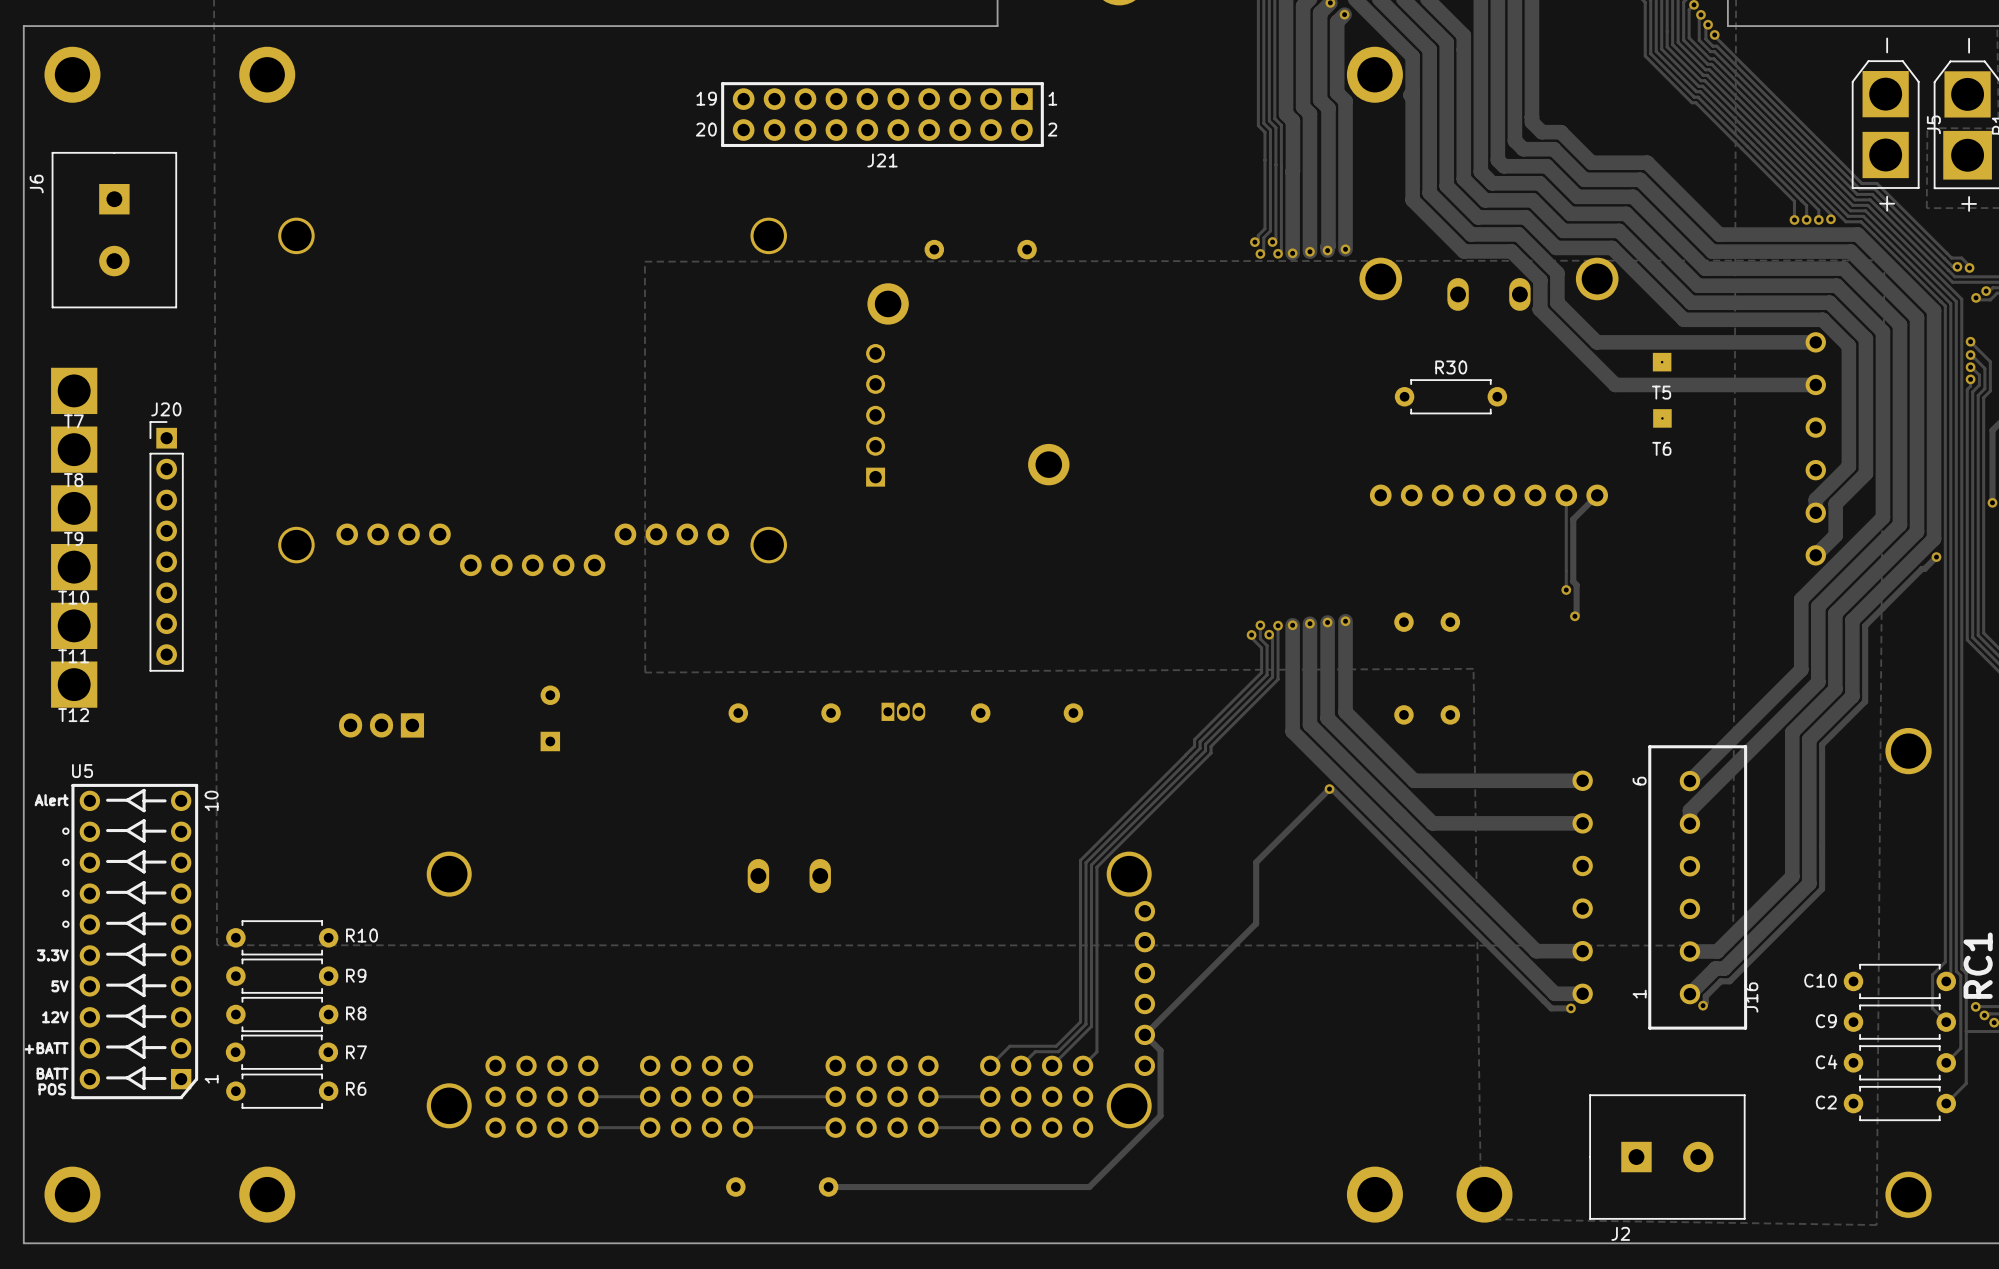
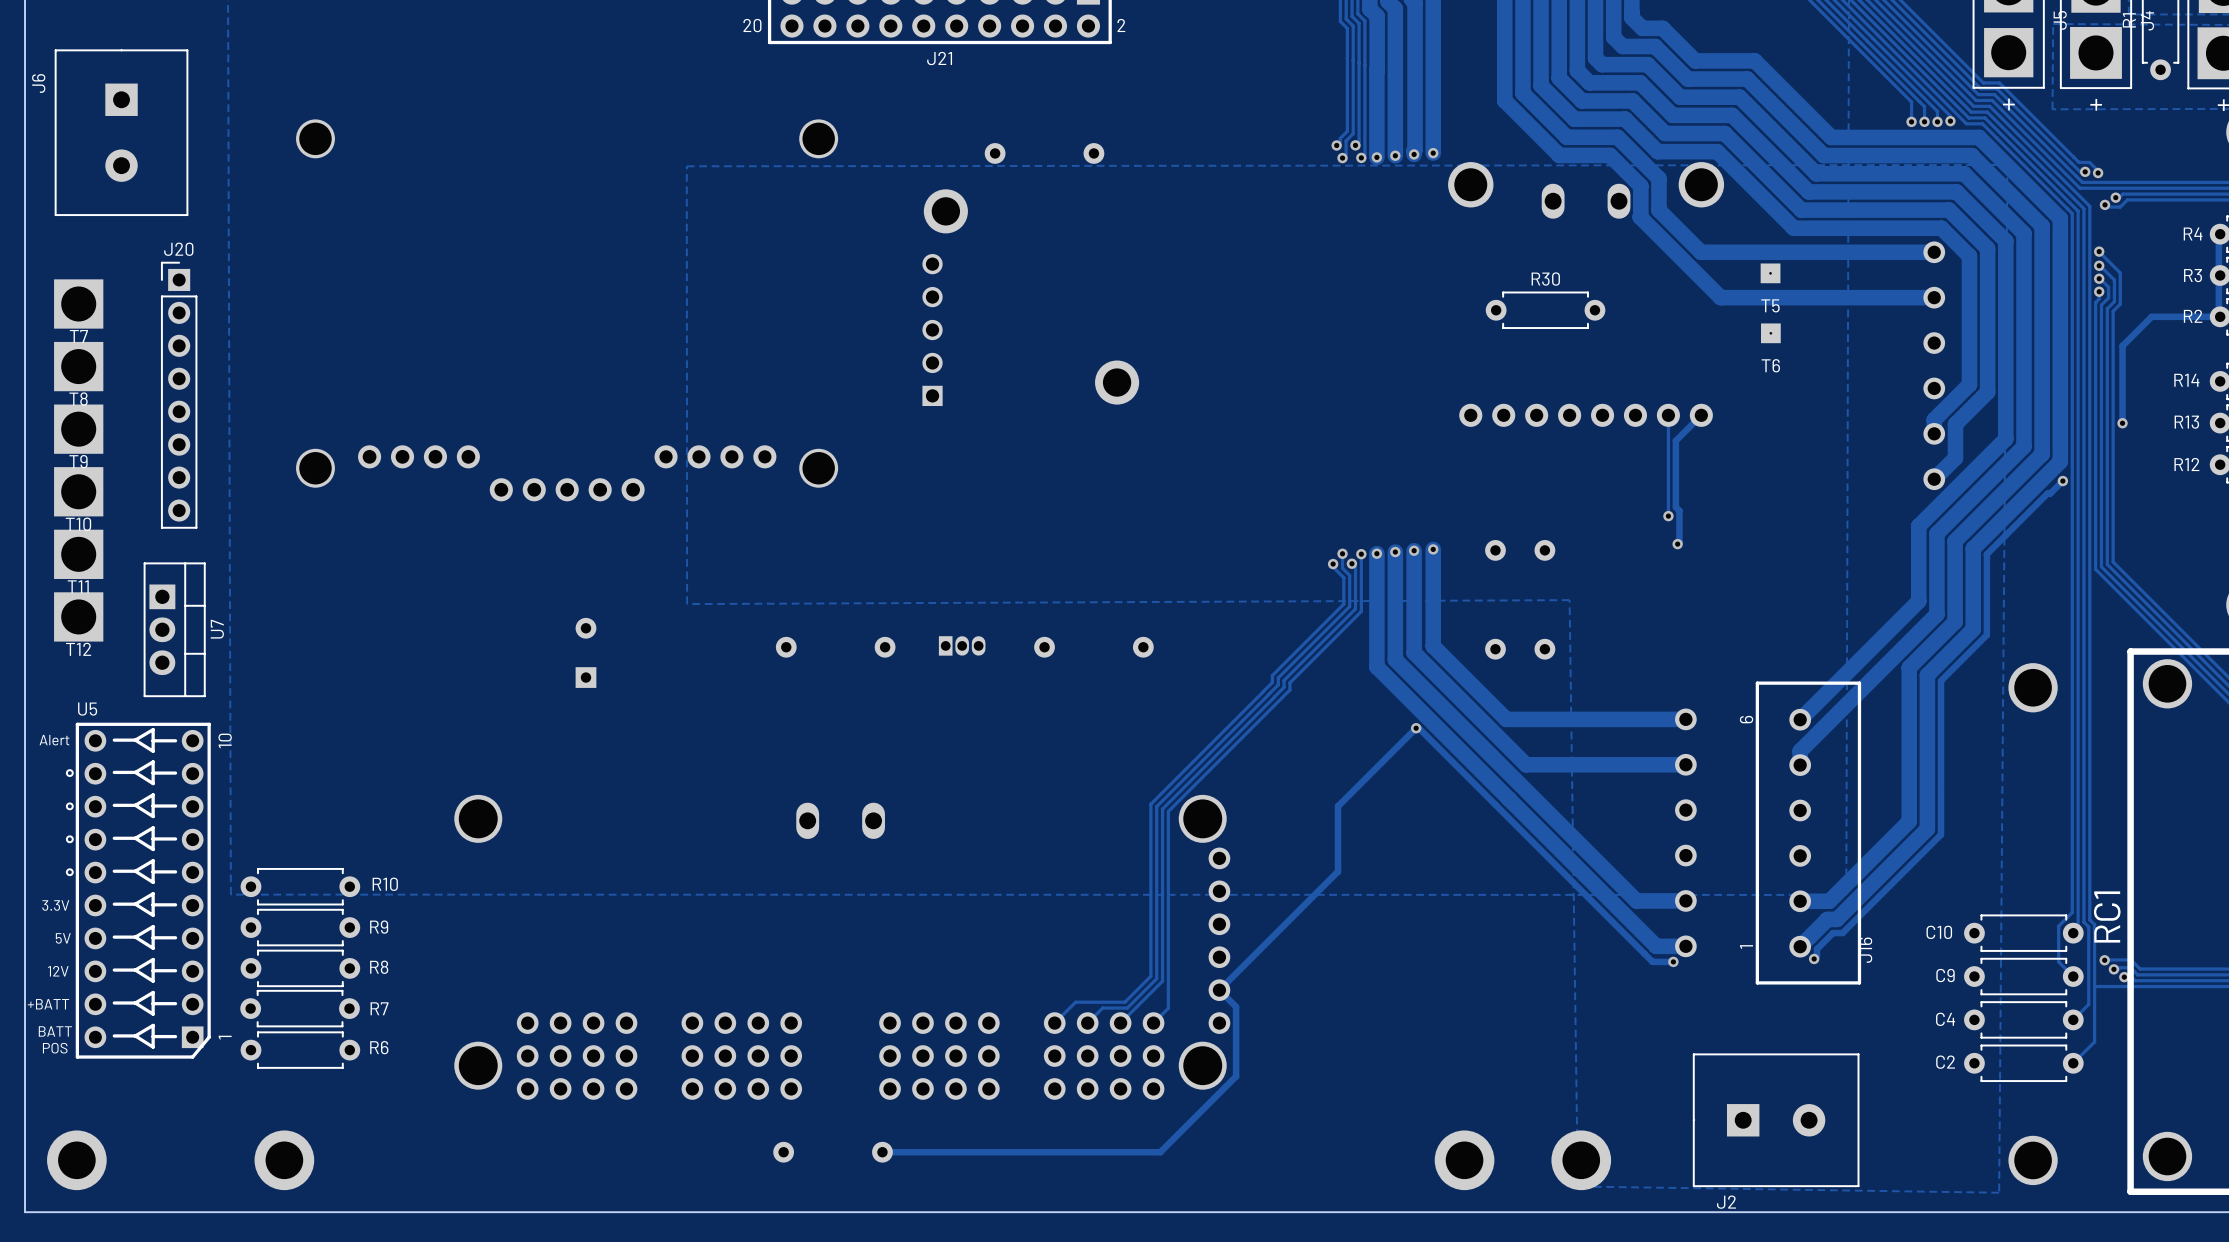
J20 position: (166, 546) -> (179, 395)
U7 side: bottom (381, 725) -> top (174, 629)
track: (589, 1096) (650, 1096) -> none
track: (742, 1096) (835, 1096) -> none
track: (928, 1096) (990, 1096) -> none
track: (588, 1127) (650, 1127) -> none
track: (742, 1127) (835, 1127) -> none
track: (928, 1127) (990, 1127) -> none

